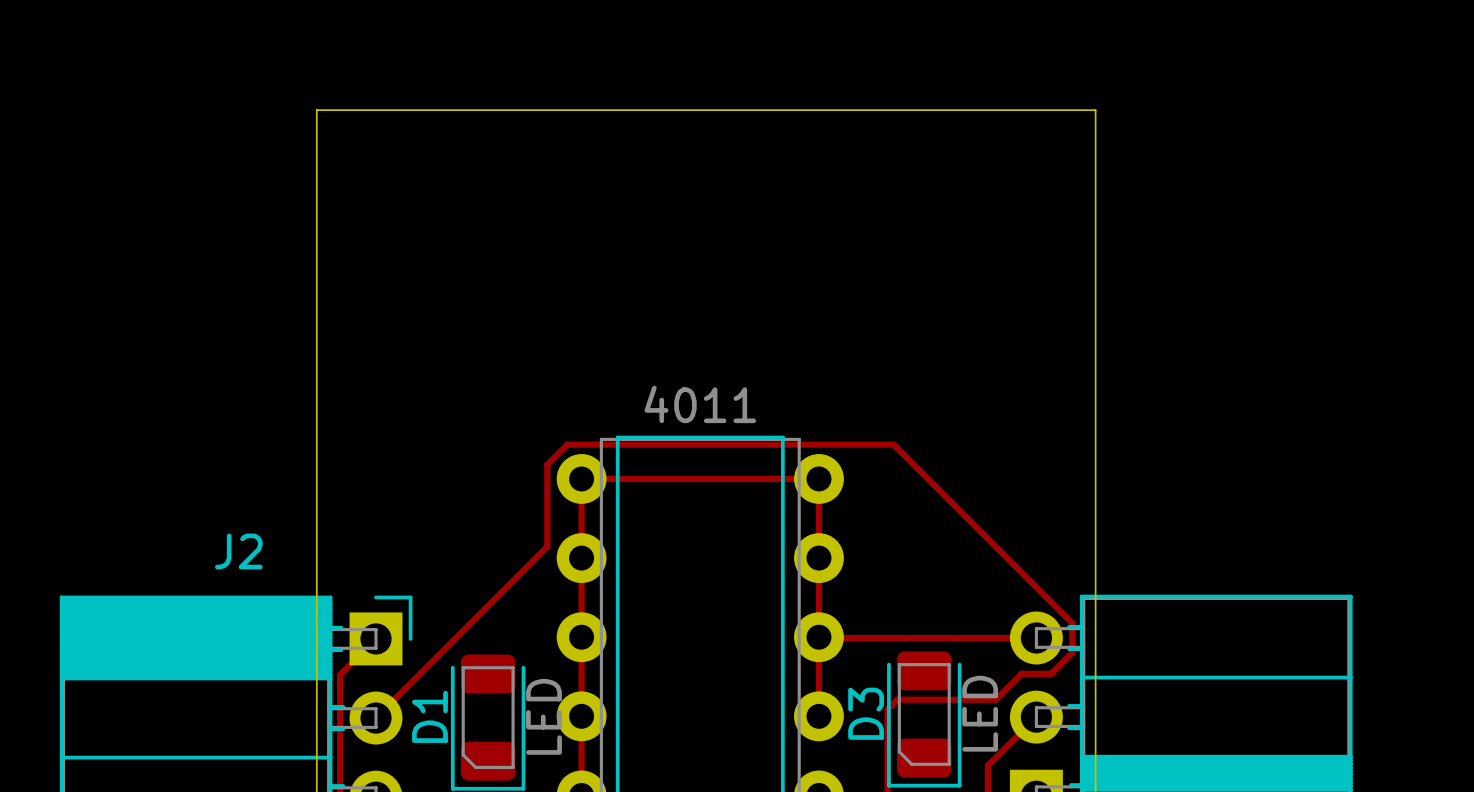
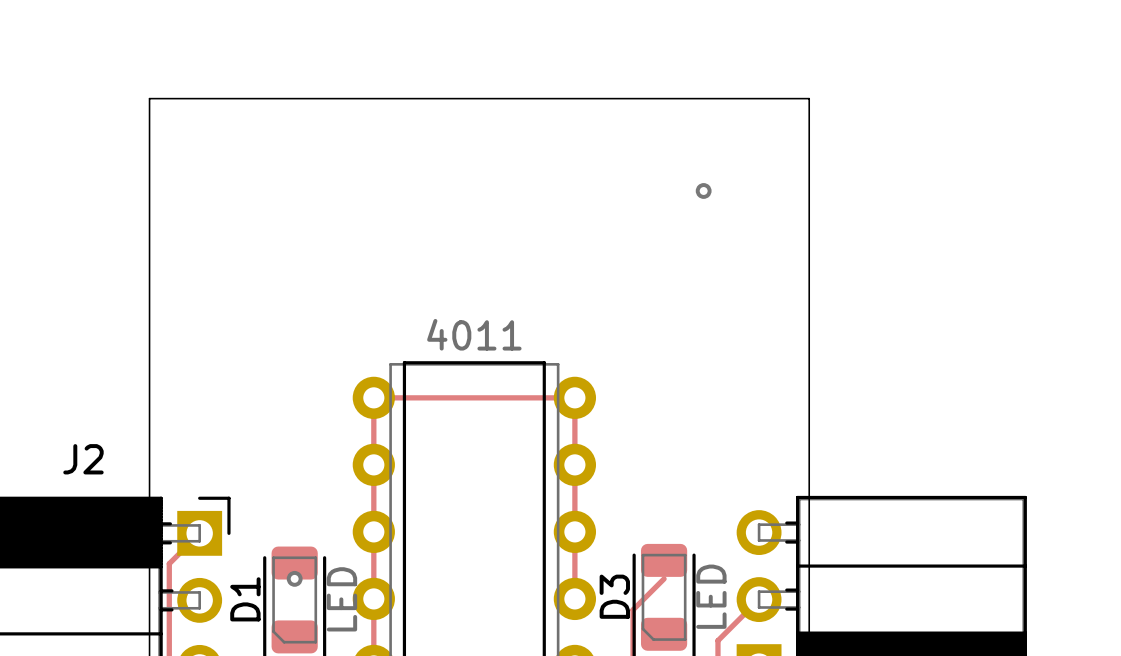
board edge: (316, 125) (316, 110) (1095, 110) (1095, 125) -> (149, 98) (809, 98)
via: none -> (703, 190)
track: (818, 637) (1036, 637) -> none
via: none -> (294, 578)
track: (376, 718) (547, 546) (547, 464) (567, 444) (893, 444) (1072, 623) (1072, 652) (1051, 673) (1021, 673) (995, 699) (897, 699) (887, 709) (887, 729) -> (664, 578) (633, 609)

